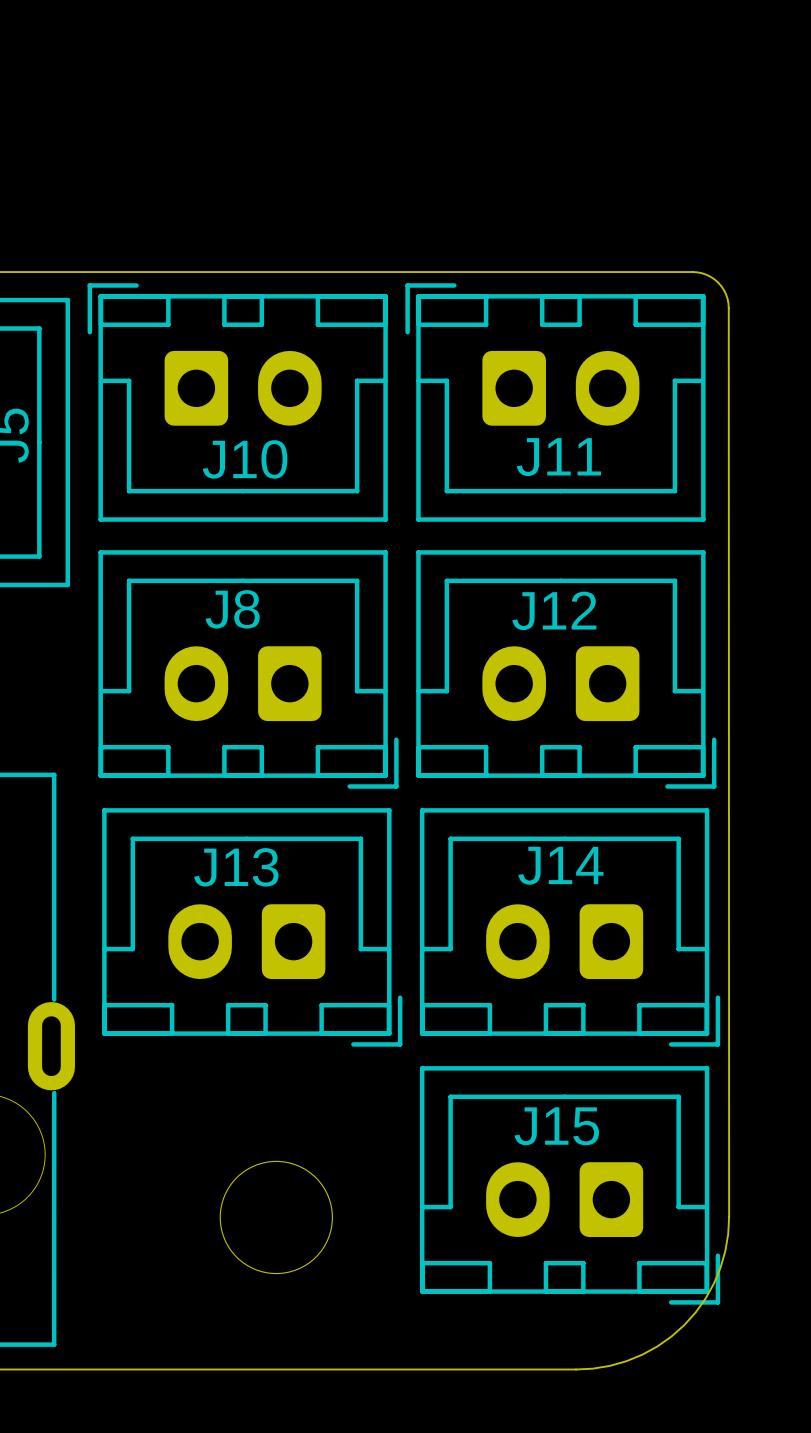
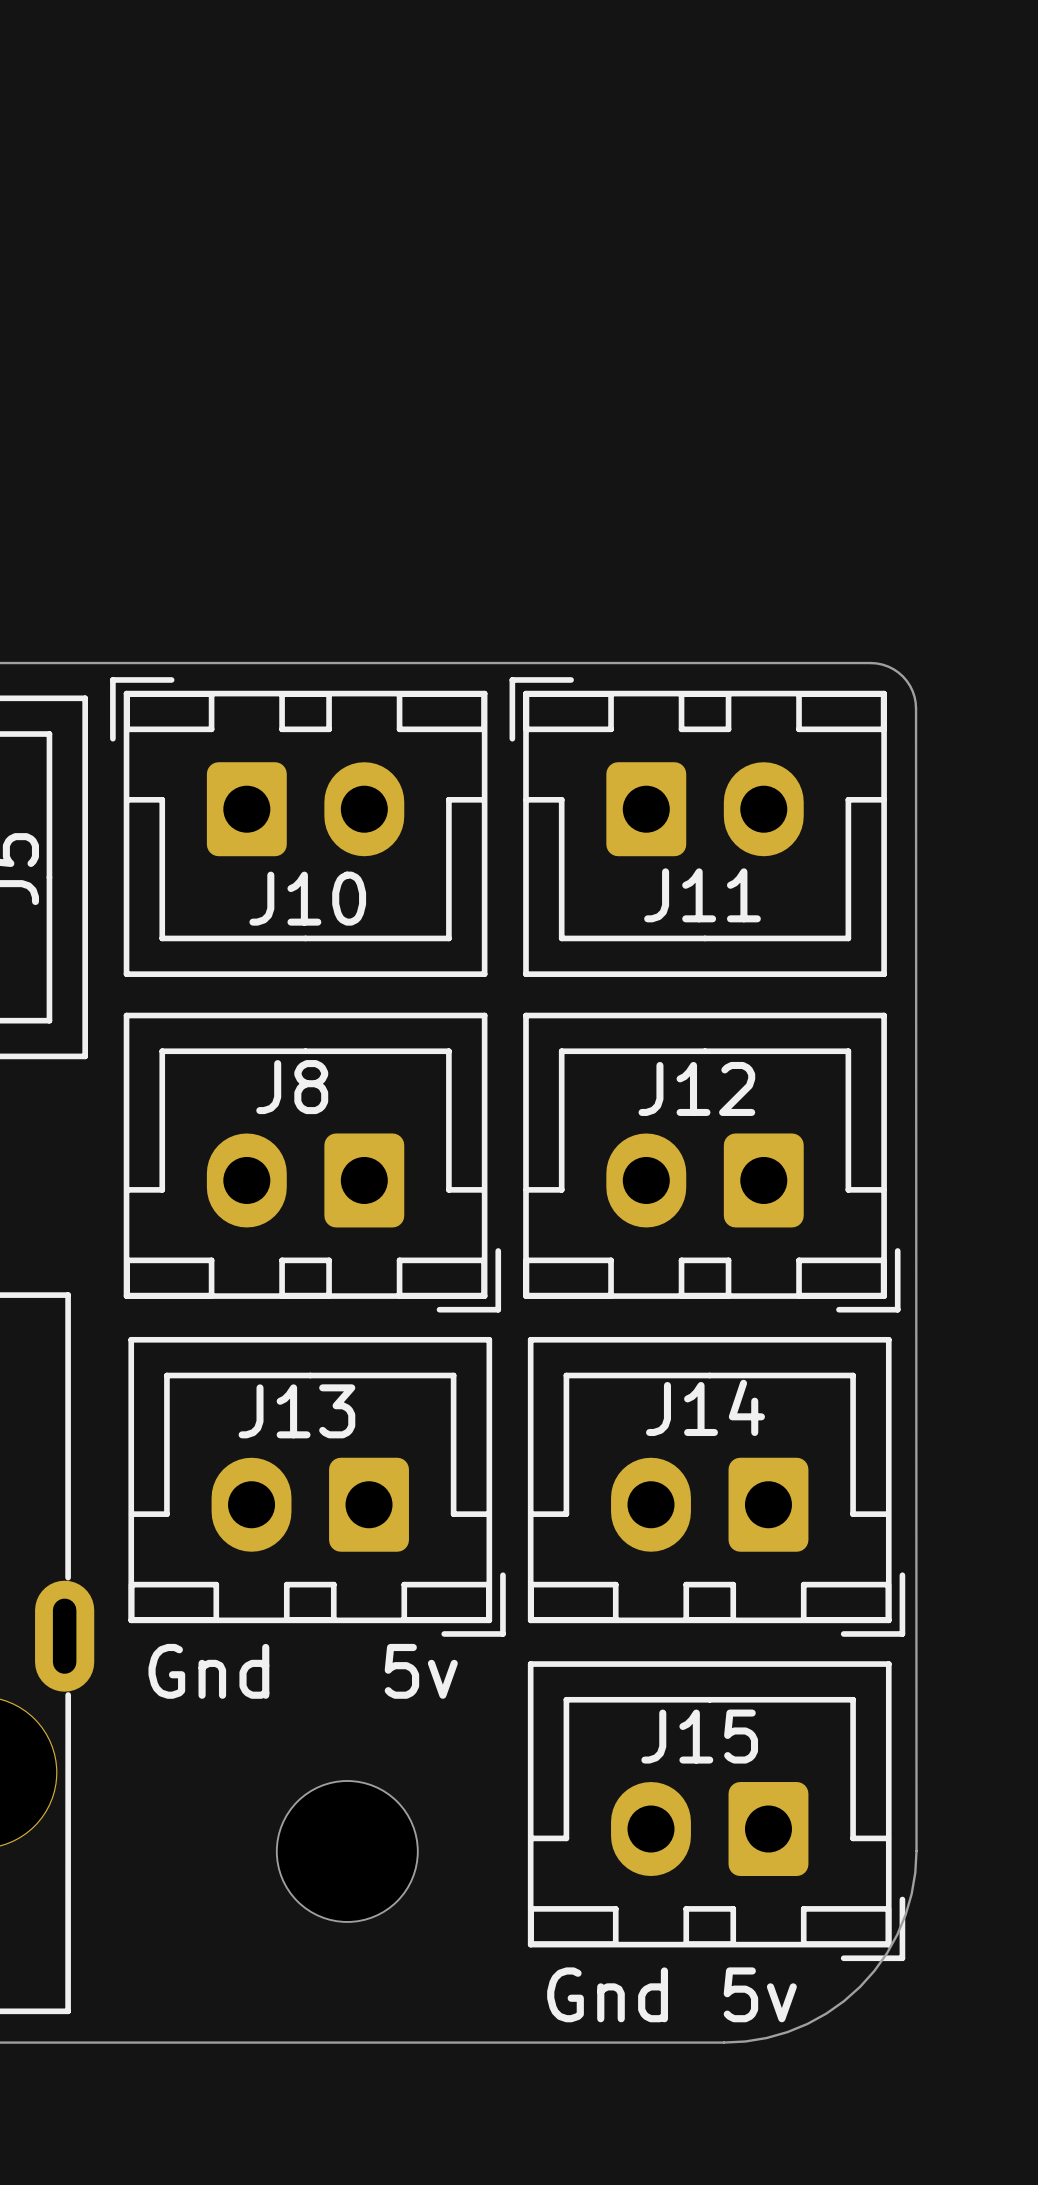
text: none -> Gnd (208, 1671)
text: none -> 5v (421, 1671)
text: none -> Gnd (607, 1994)
text: none -> 5v (760, 1994)

